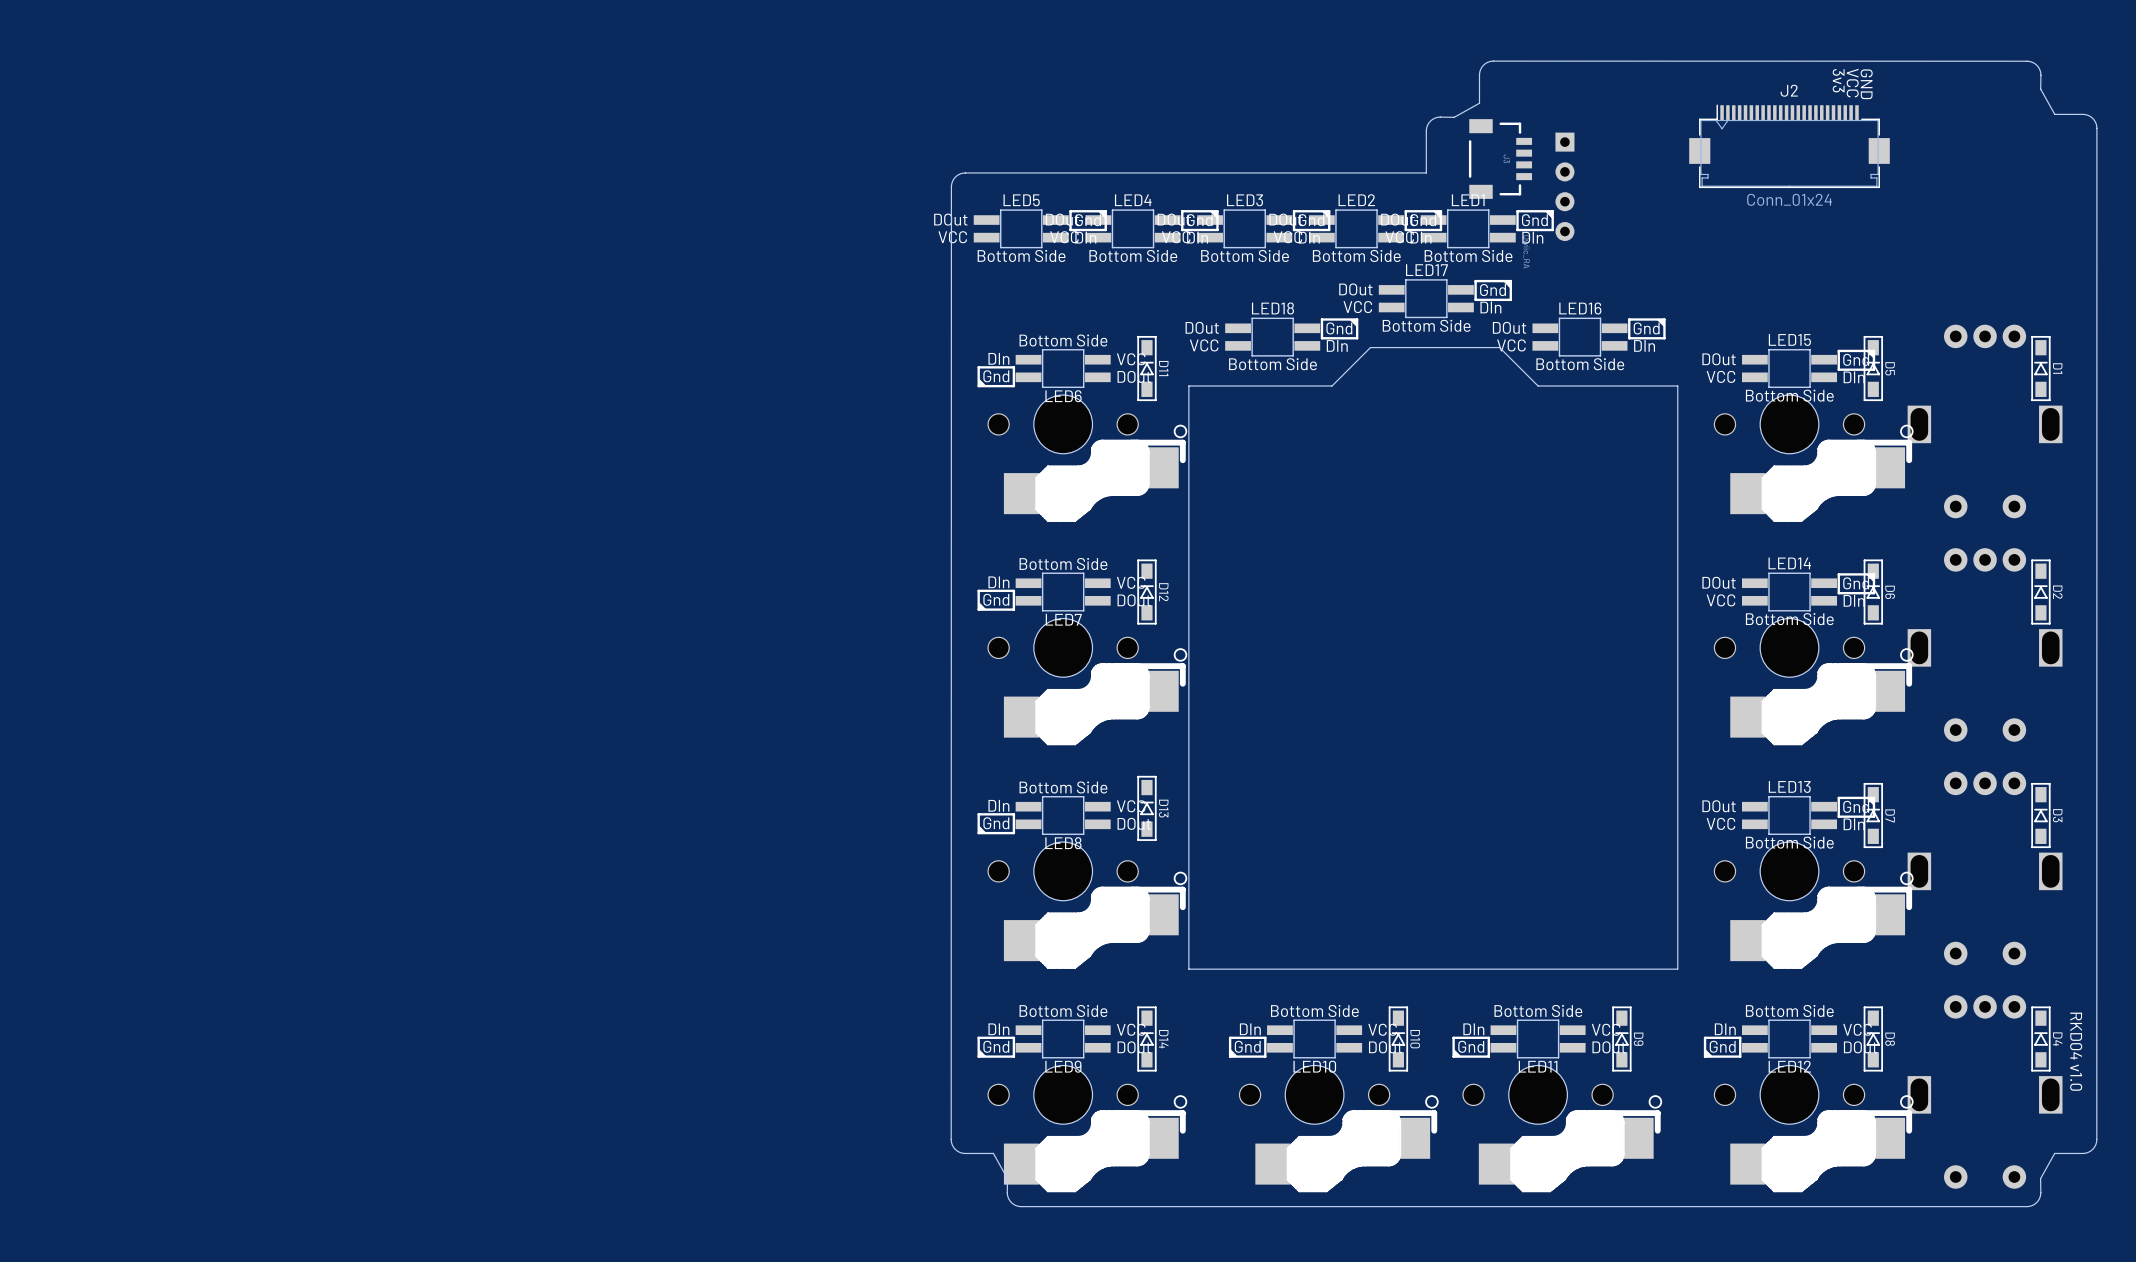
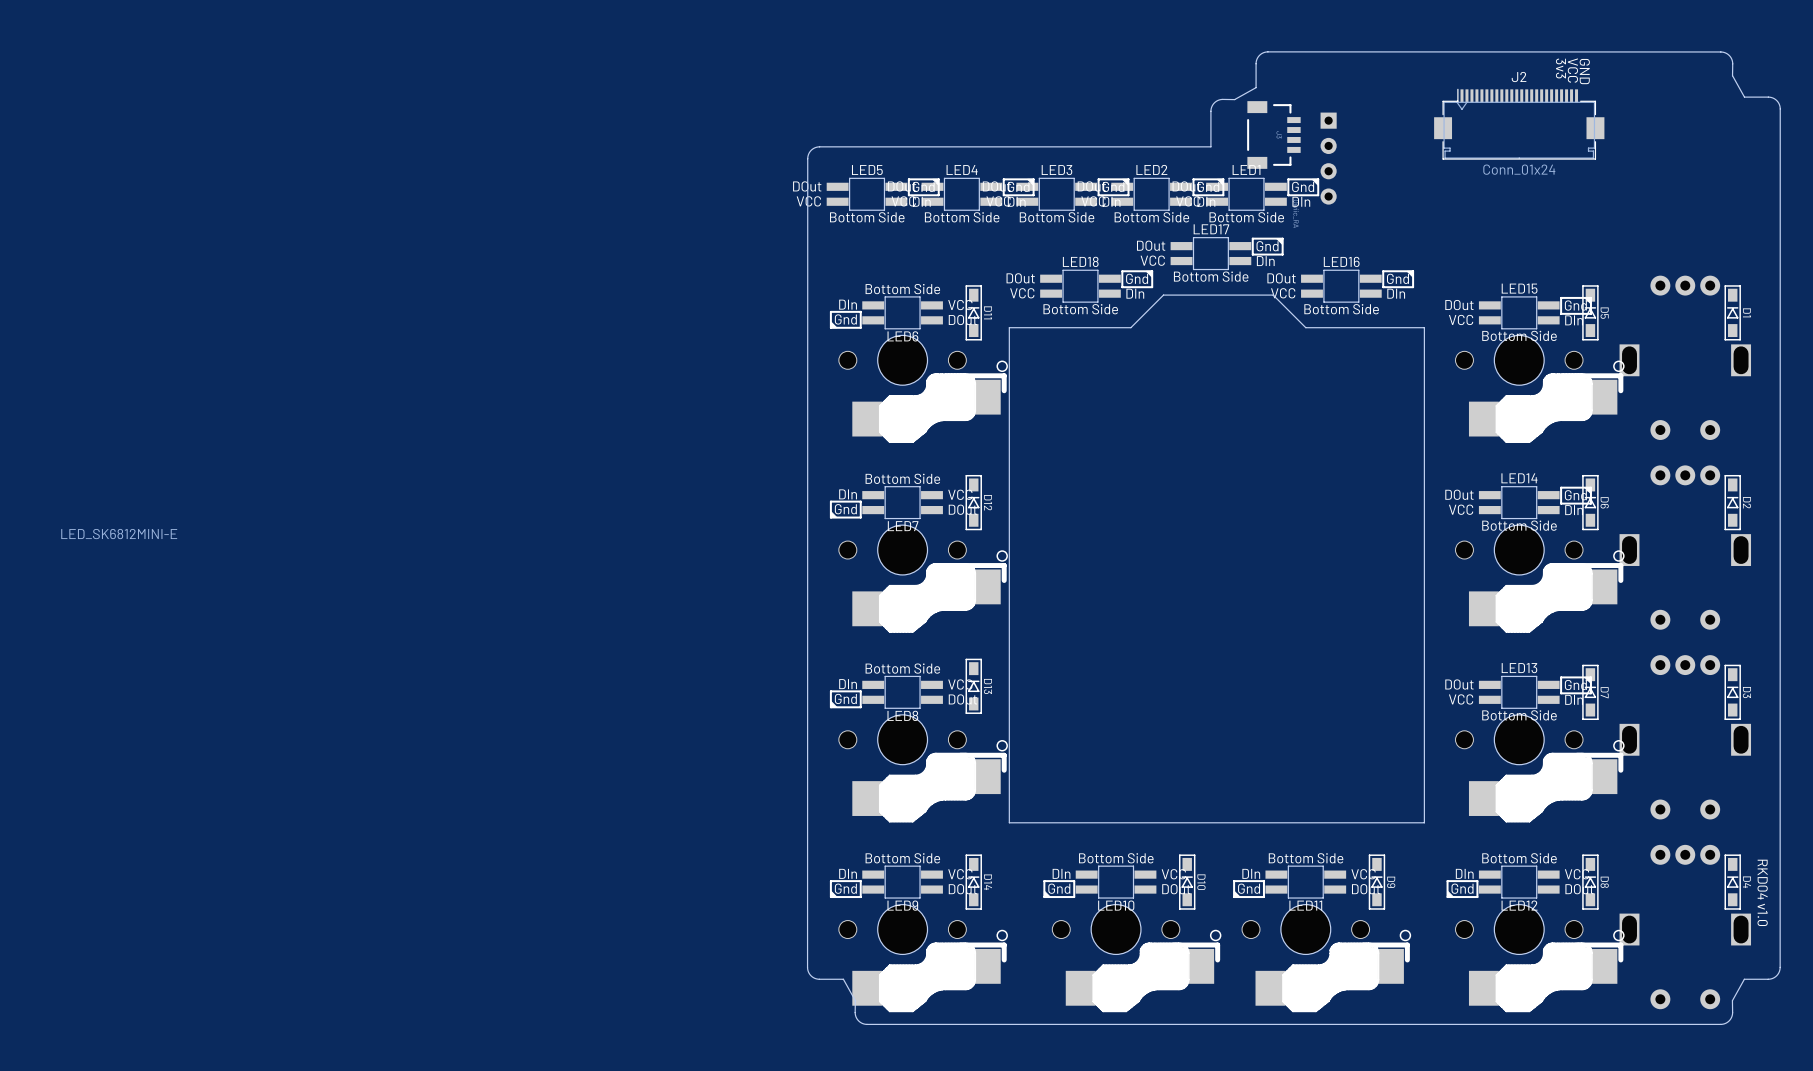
LED6 value: none -> LED_SK6812MINI-E (119, 534)

